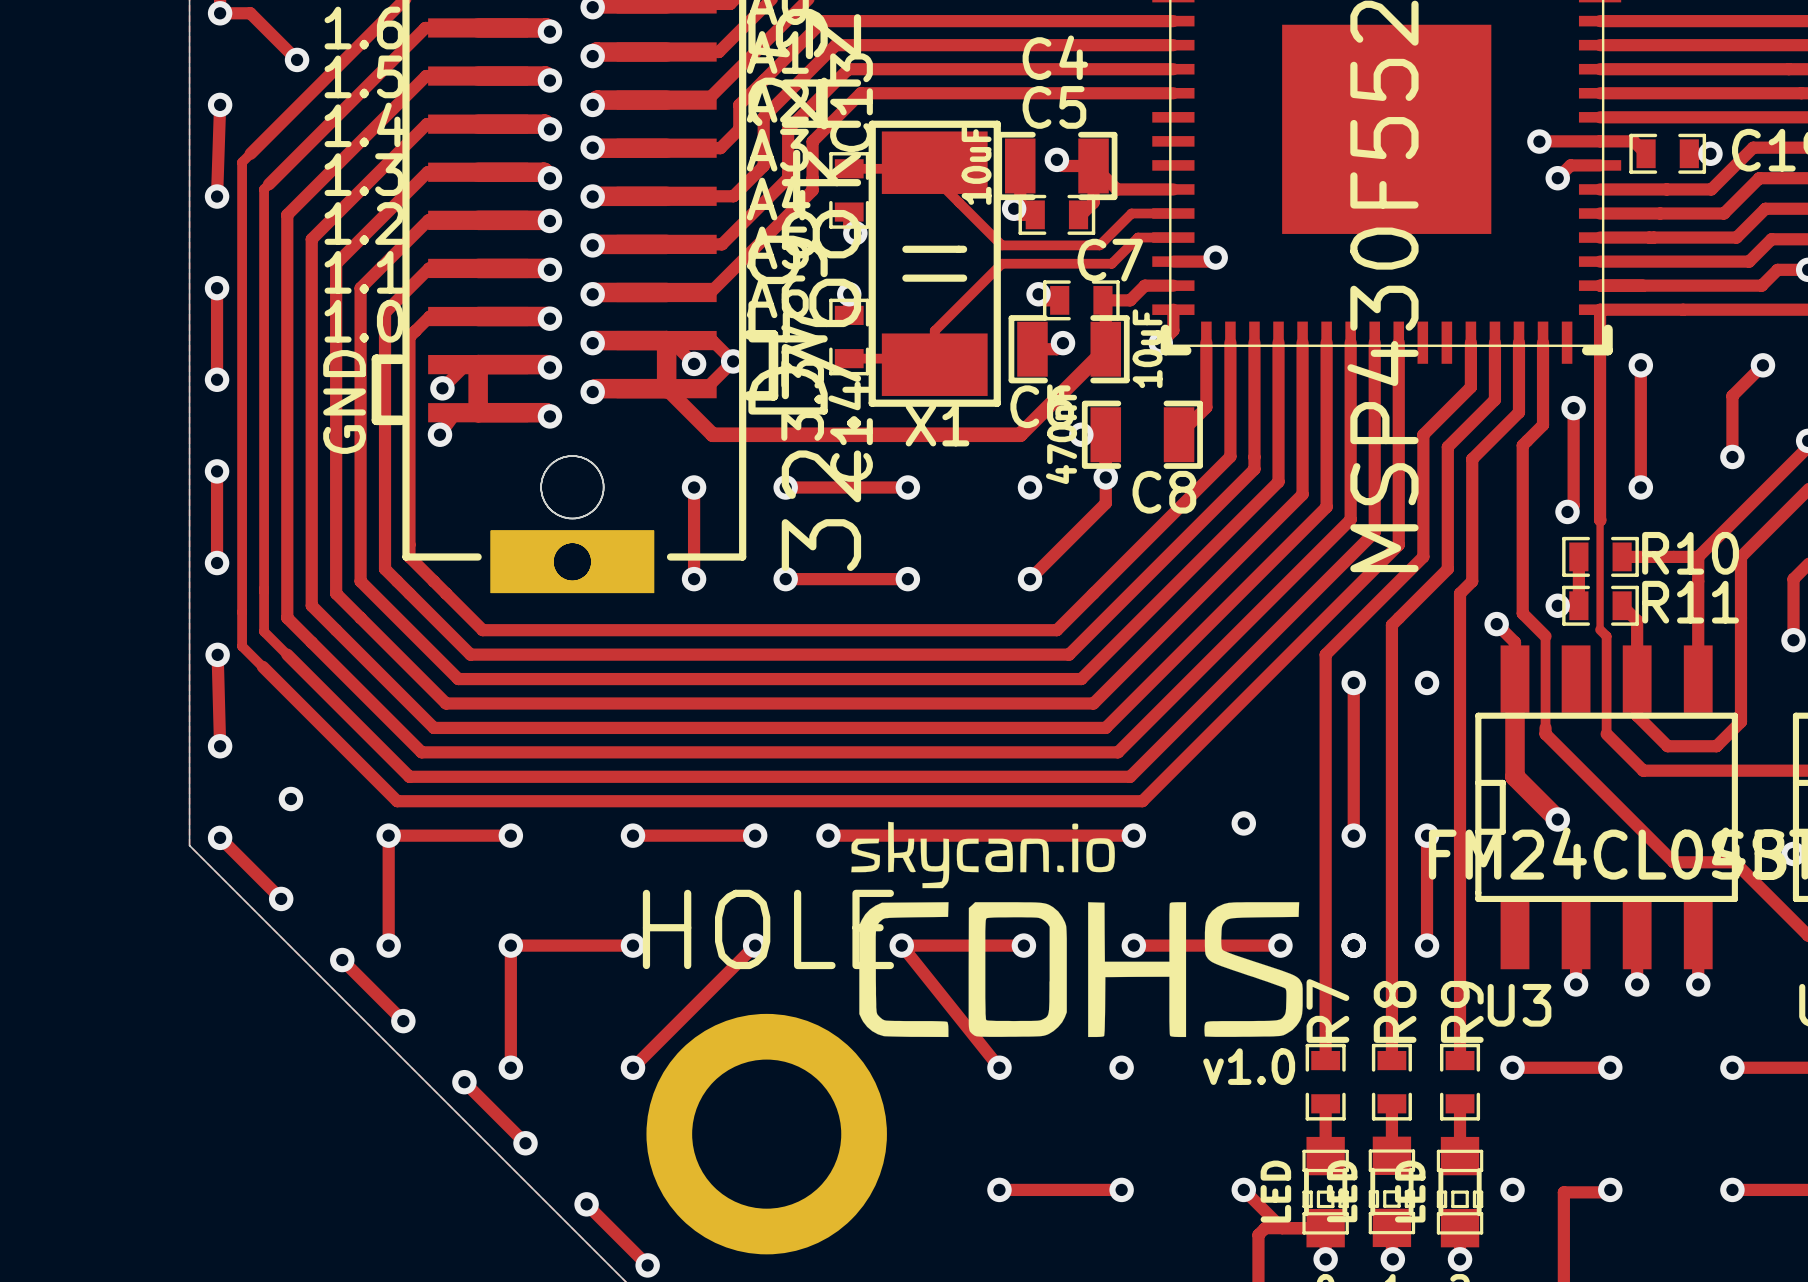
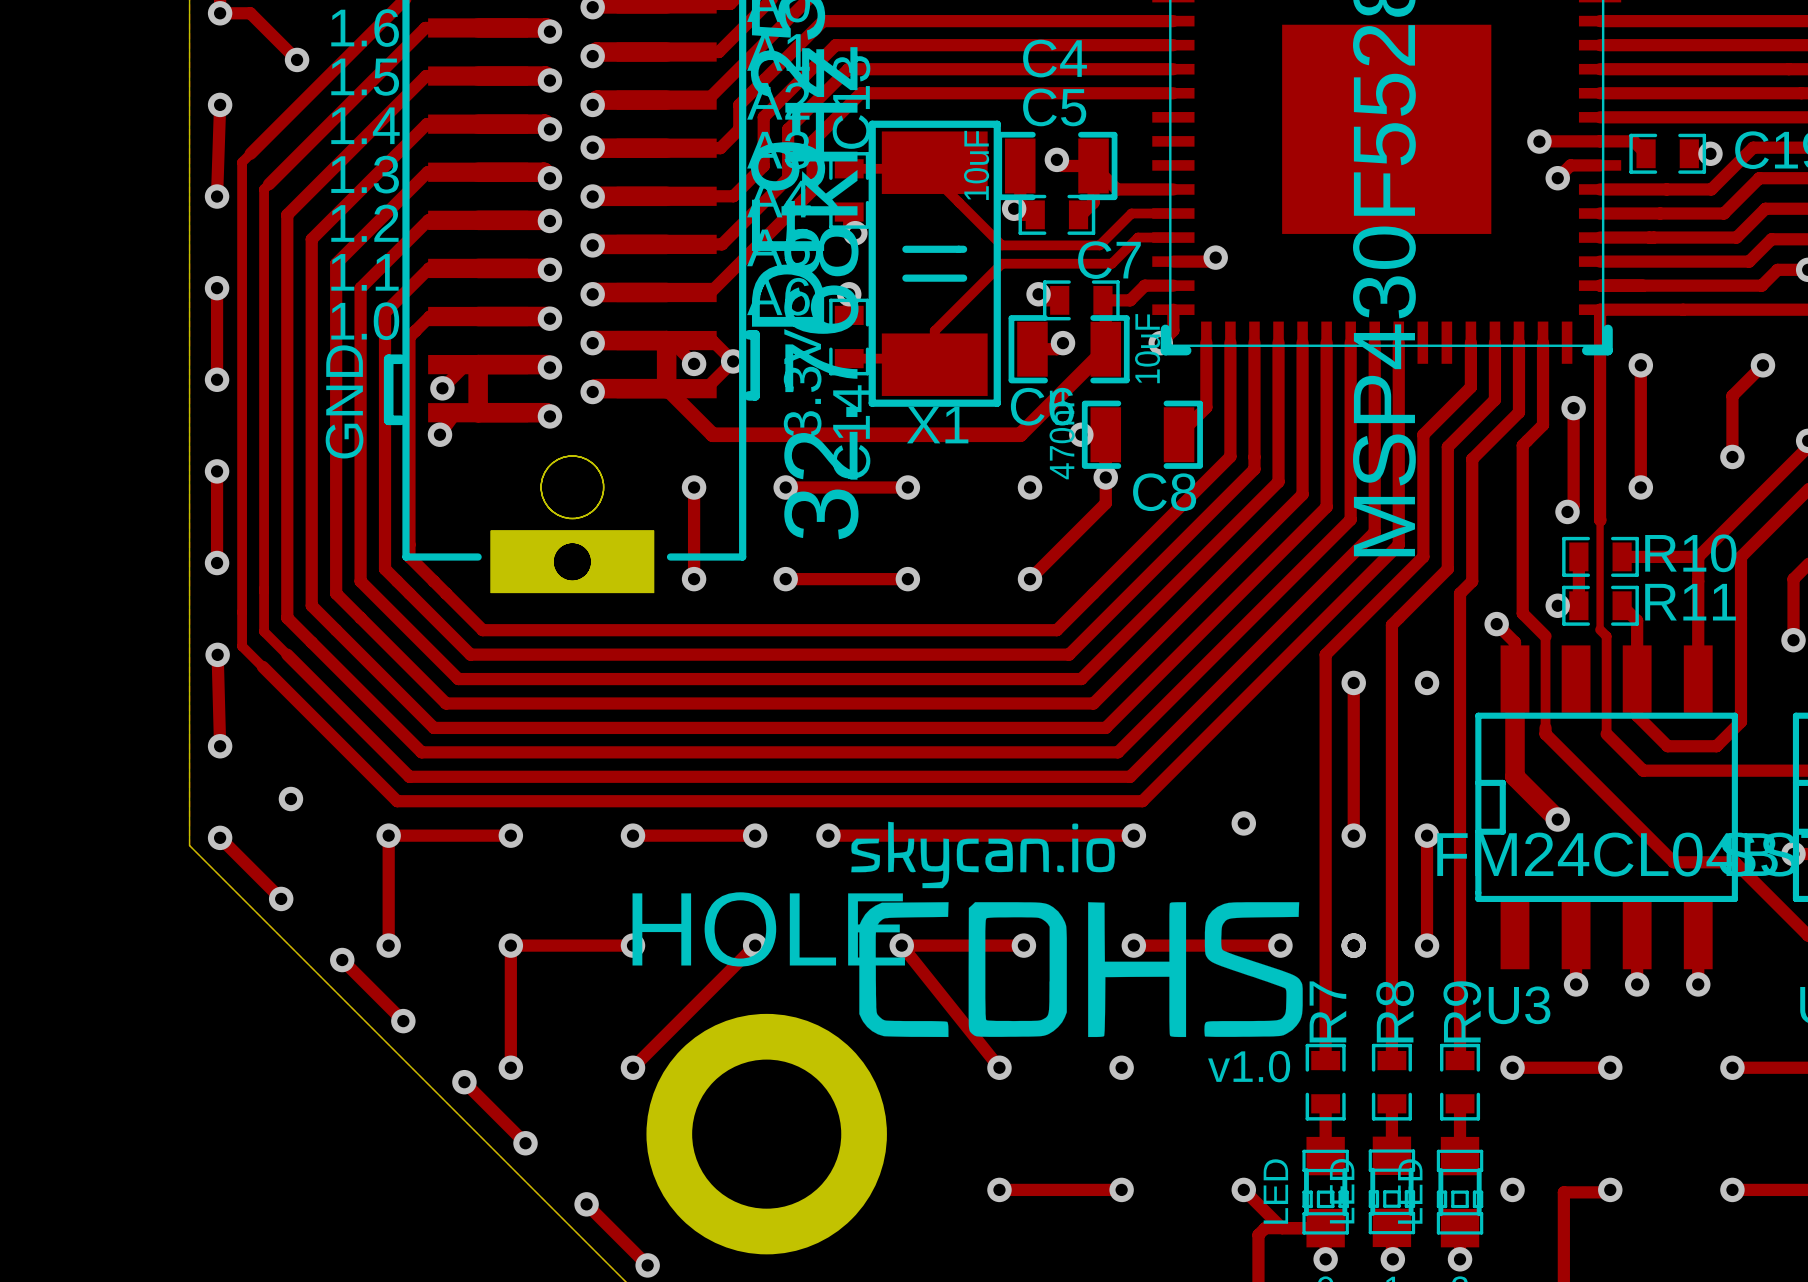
line: (755, 334) (773, 334) (773, 395) (755, 395) -> (755, 334) (755, 395)
line: (388, 359) (376, 359) (376, 420) (388, 420) -> (388, 359) (388, 420)

